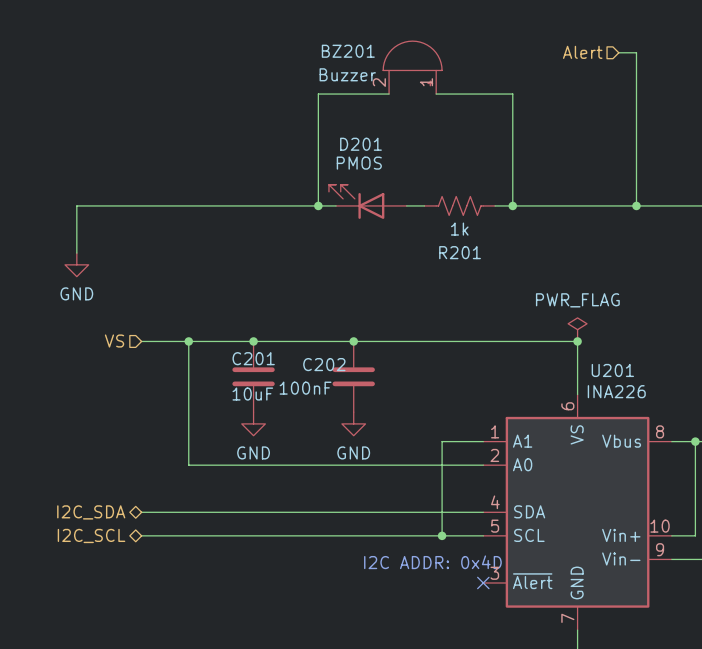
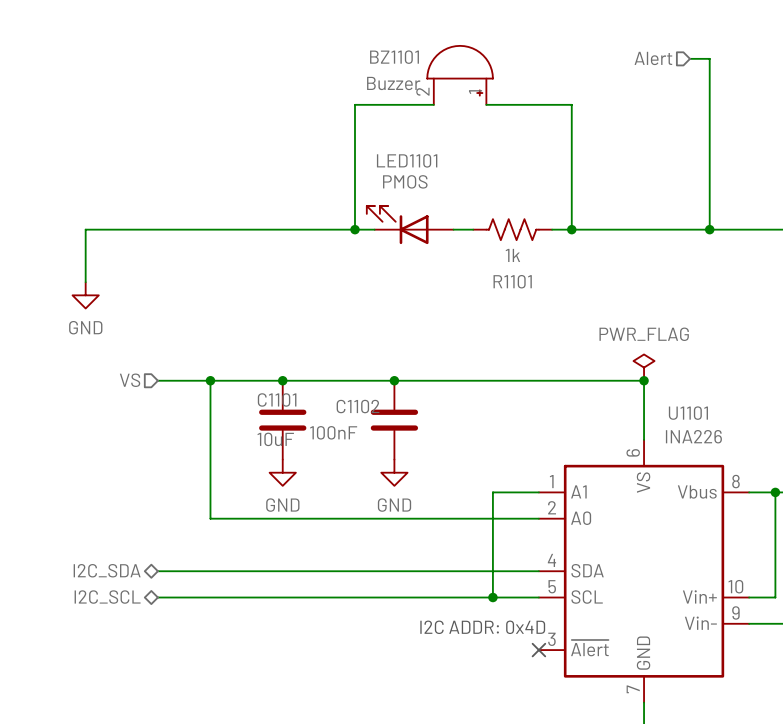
BZ201 name: BZ201 (348, 51) -> BZ1101 (394, 57)
D201 name: D201 (360, 144) -> LED1101 (407, 160)
R201 name: R201 (460, 252) -> R1101 (512, 281)
C201 name: C201 (253, 358) -> C1101 (277, 399)
C202 name: C202 (324, 364) -> C1102 (358, 406)
U201 name: U201 (612, 370) -> U1101 (688, 413)

